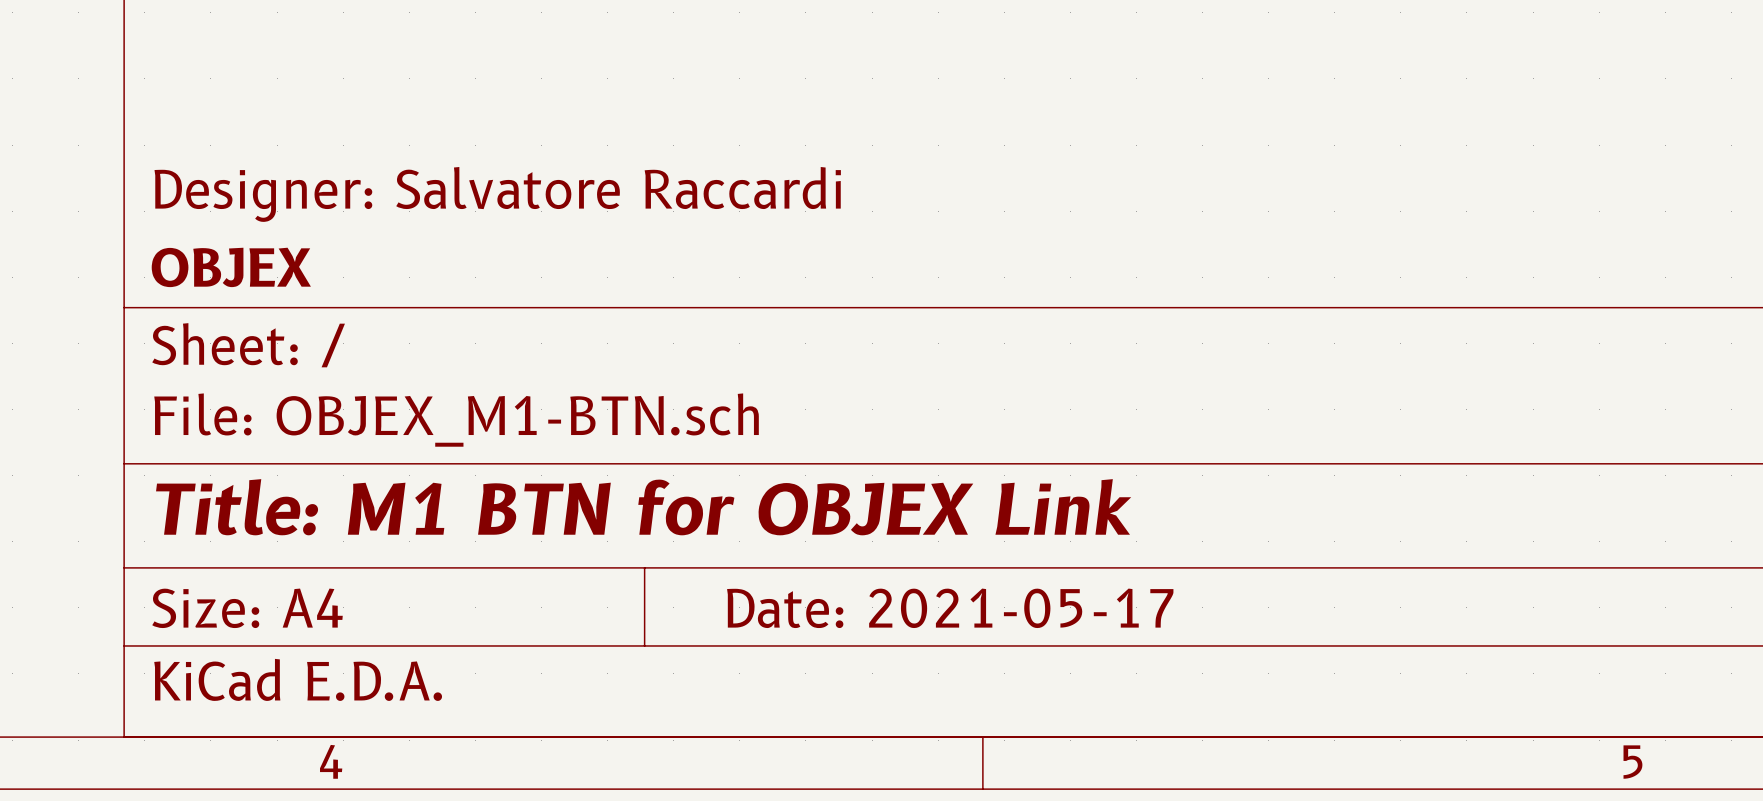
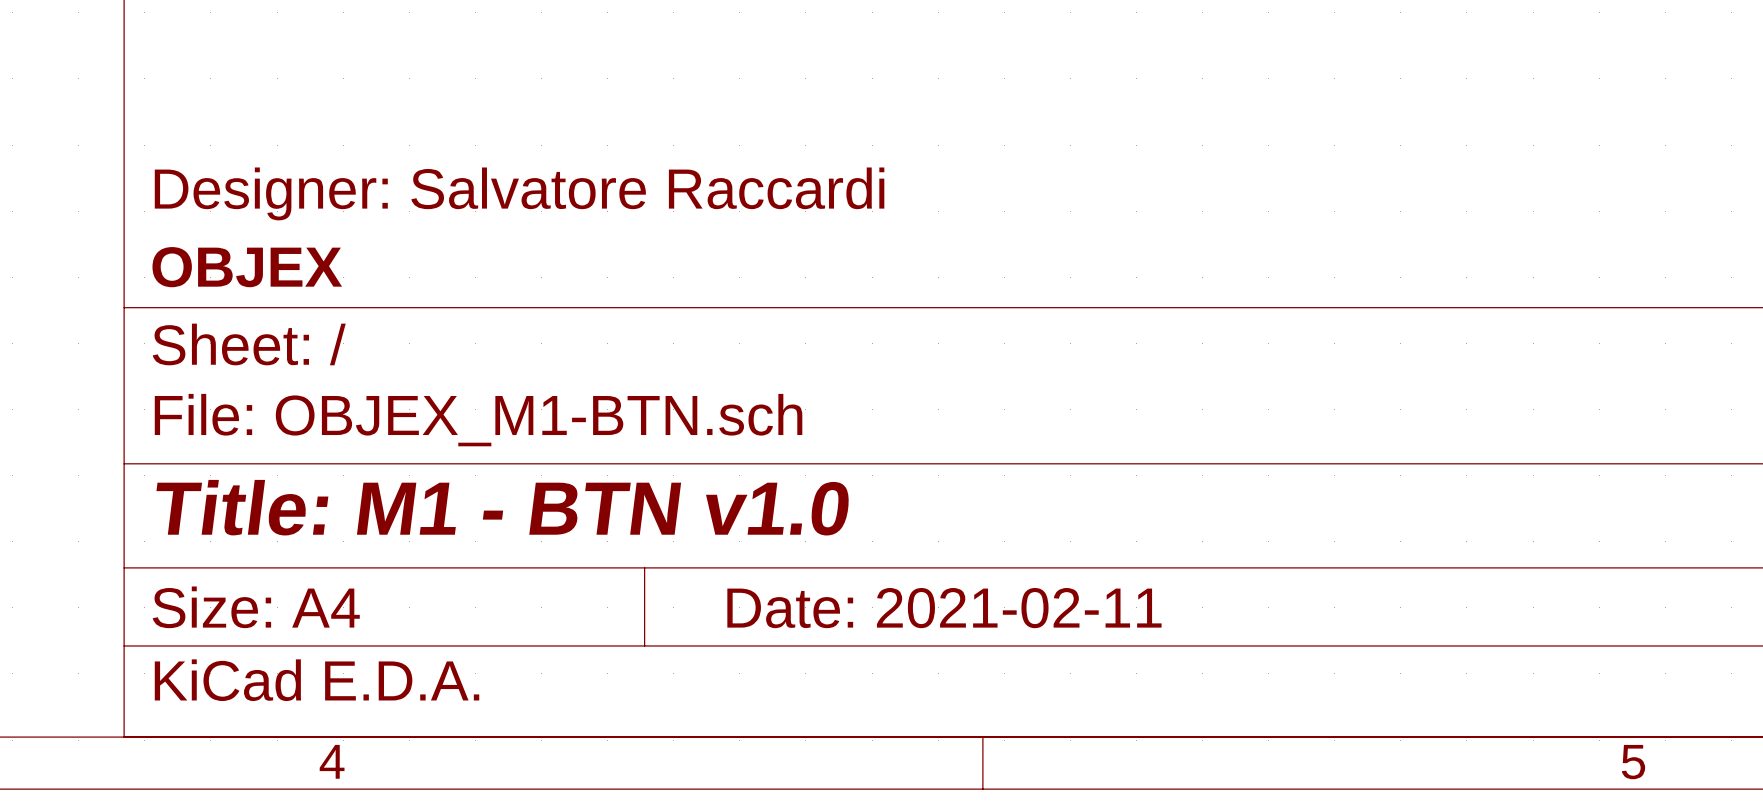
title block: Title: M1 BTN for OBJEX Link (643, 507) -> Title: M1 - BTN v1.0 (503, 507)
title block: Date: 2021-05-17 (950, 608) -> Date: 2021-02-11 (944, 608)

